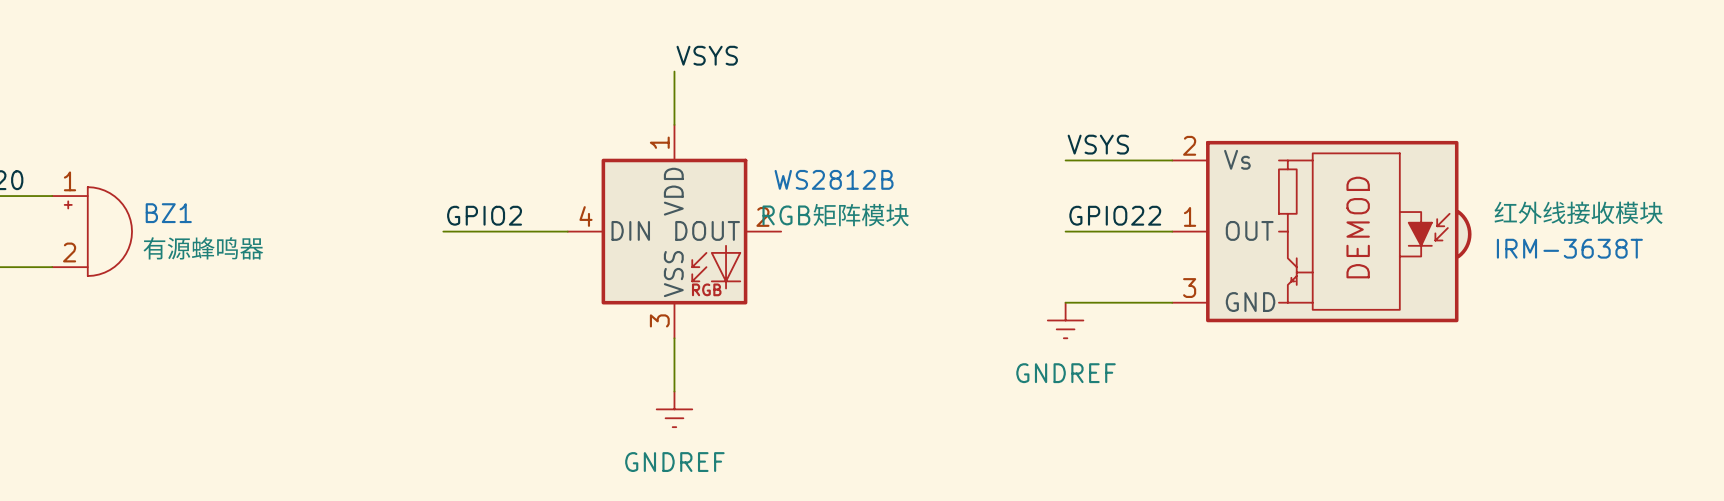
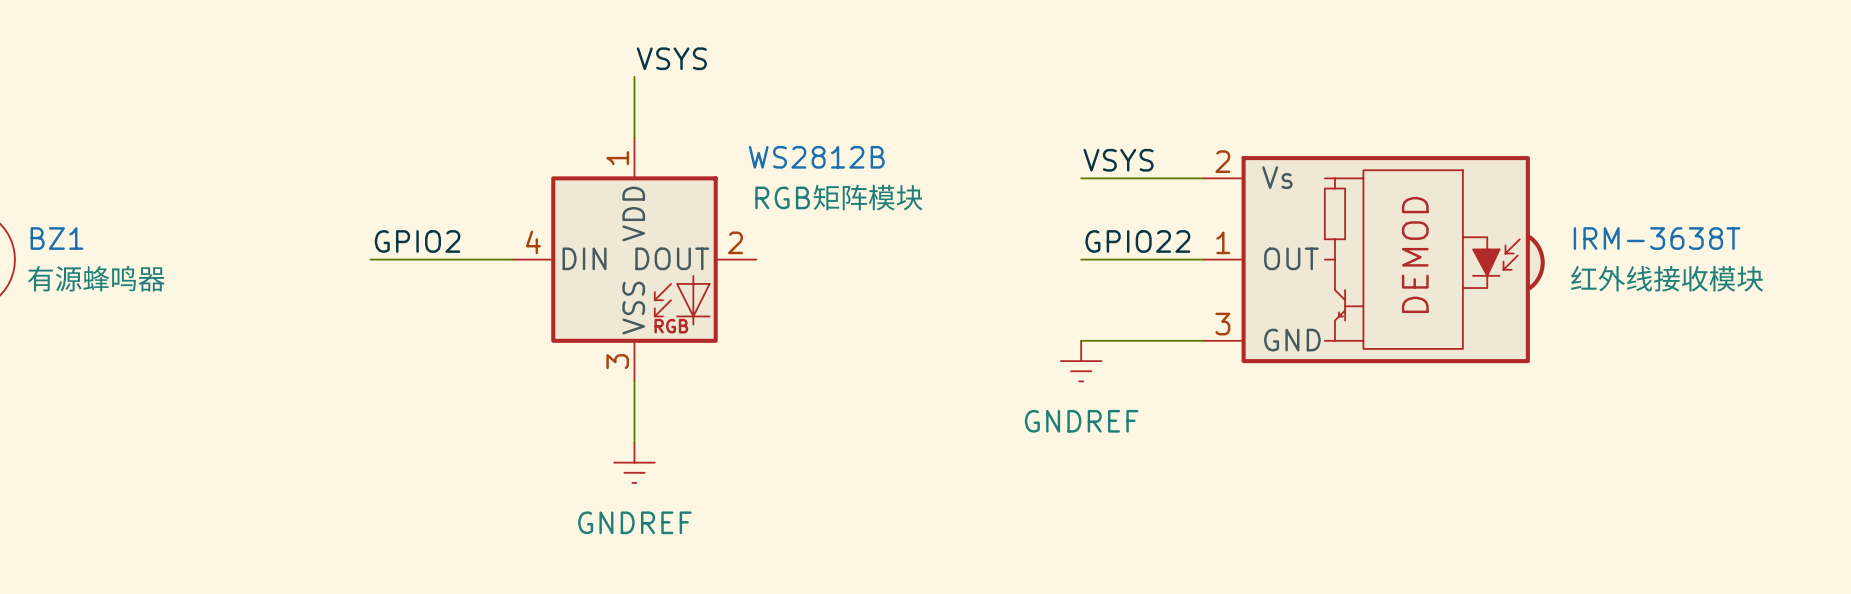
WS2812B name position: WS2812B (834, 179) -> WS2812B (816, 157)
IRM-3638T value position: 红外线接收模块 (1578, 212) -> 红外线接收模块 (1667, 278)
WS2812B value position: RGB矩阵模块 (836, 215) -> RGB矩阵模块 (839, 197)
IRM-3638T name position: IRM-3638T (1569, 248) -> IRM-3638T (1657, 238)

